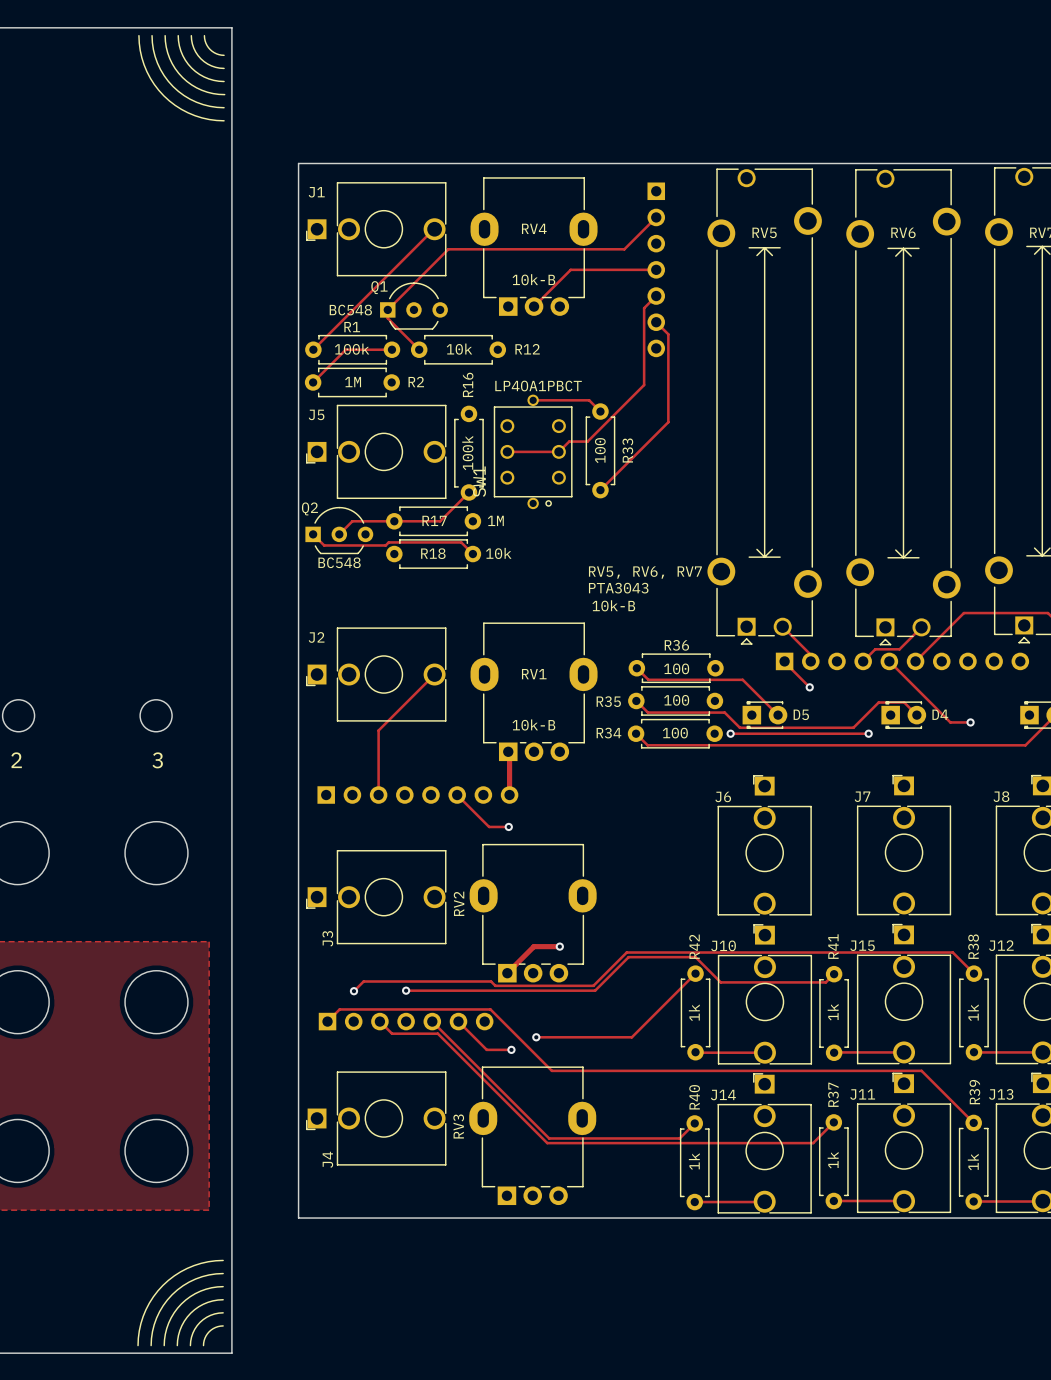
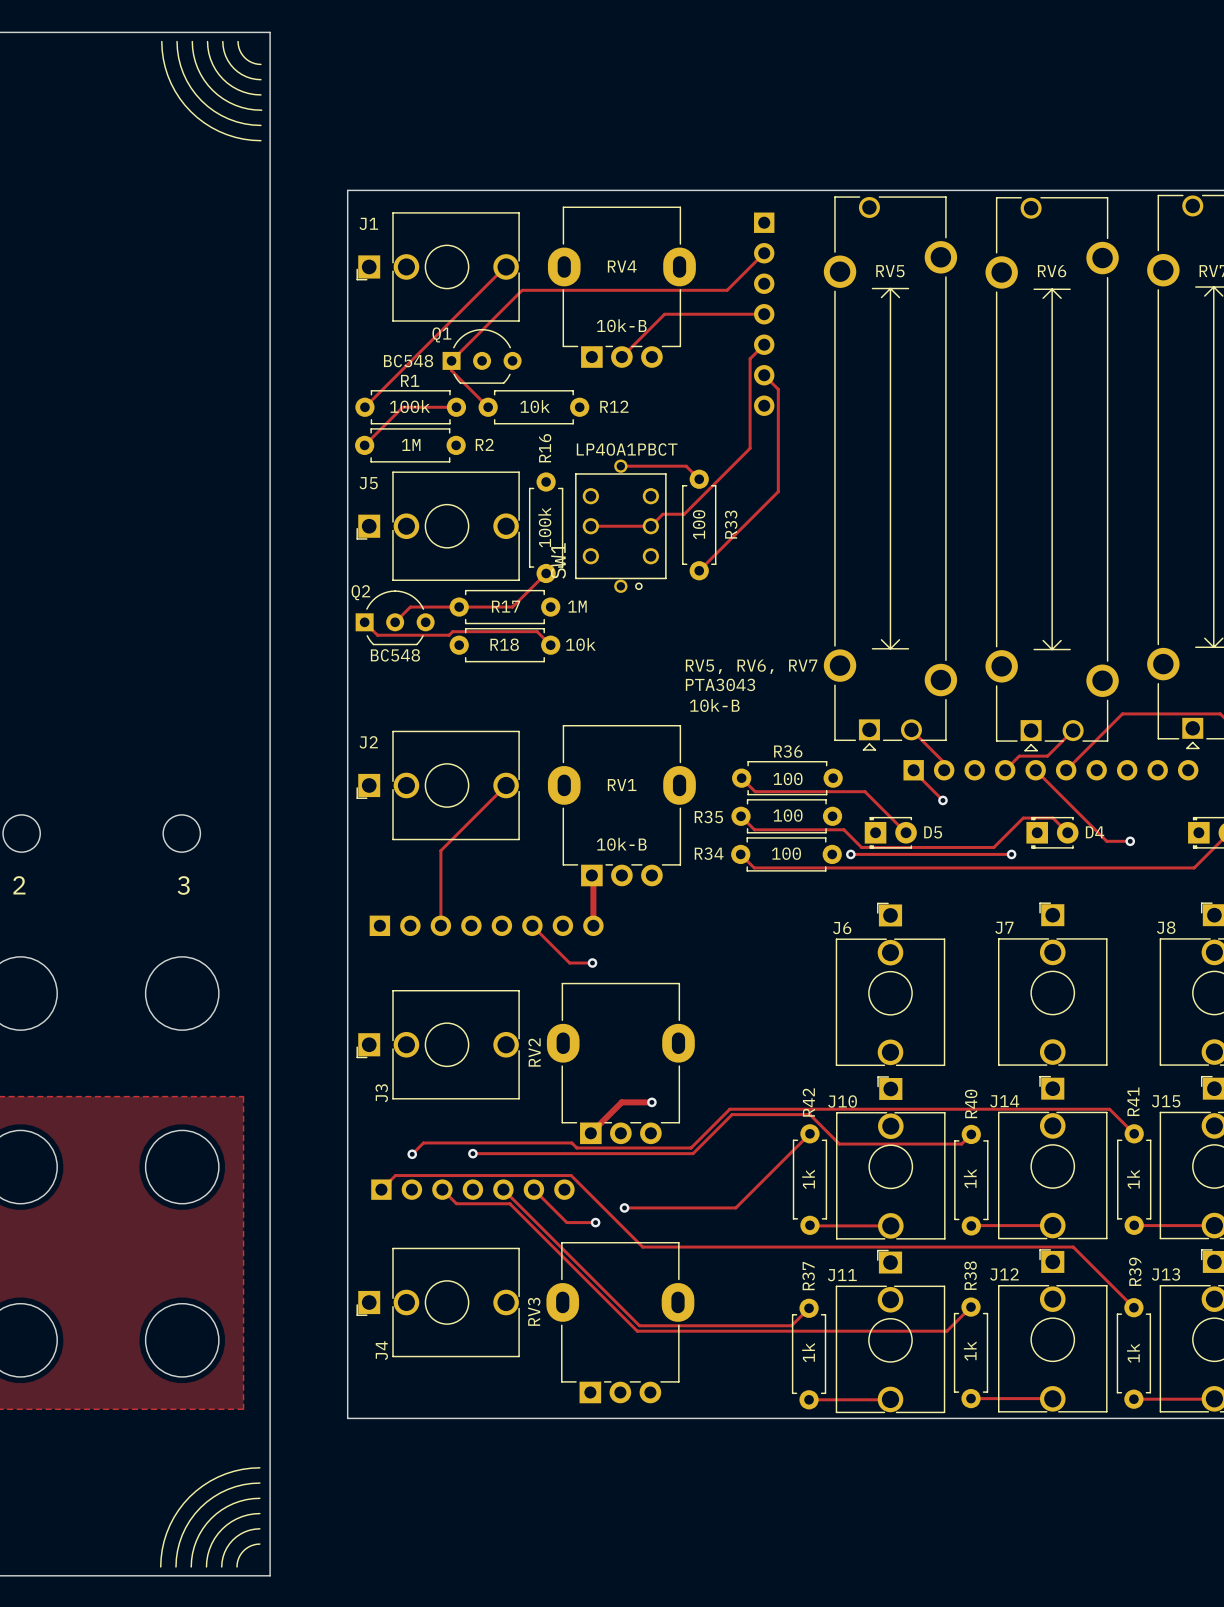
J15 name: J15 (862, 945) -> J14 (1004, 1101)
J12 name: J12 (1001, 945) -> J15 (1166, 1101)
R41 name: R41 (833, 946) -> R40 (971, 1103)
R38 name: R38 (973, 946) -> R41 (1133, 1101)
R37 name: R37 (833, 1094) -> R38 (970, 1275)
J11 name: J11 (862, 1094) -> J12 (1004, 1274)
J14 name: J14 (723, 1095) -> J11 (842, 1275)
R40 name: R40 (694, 1097) -> R37 (808, 1276)

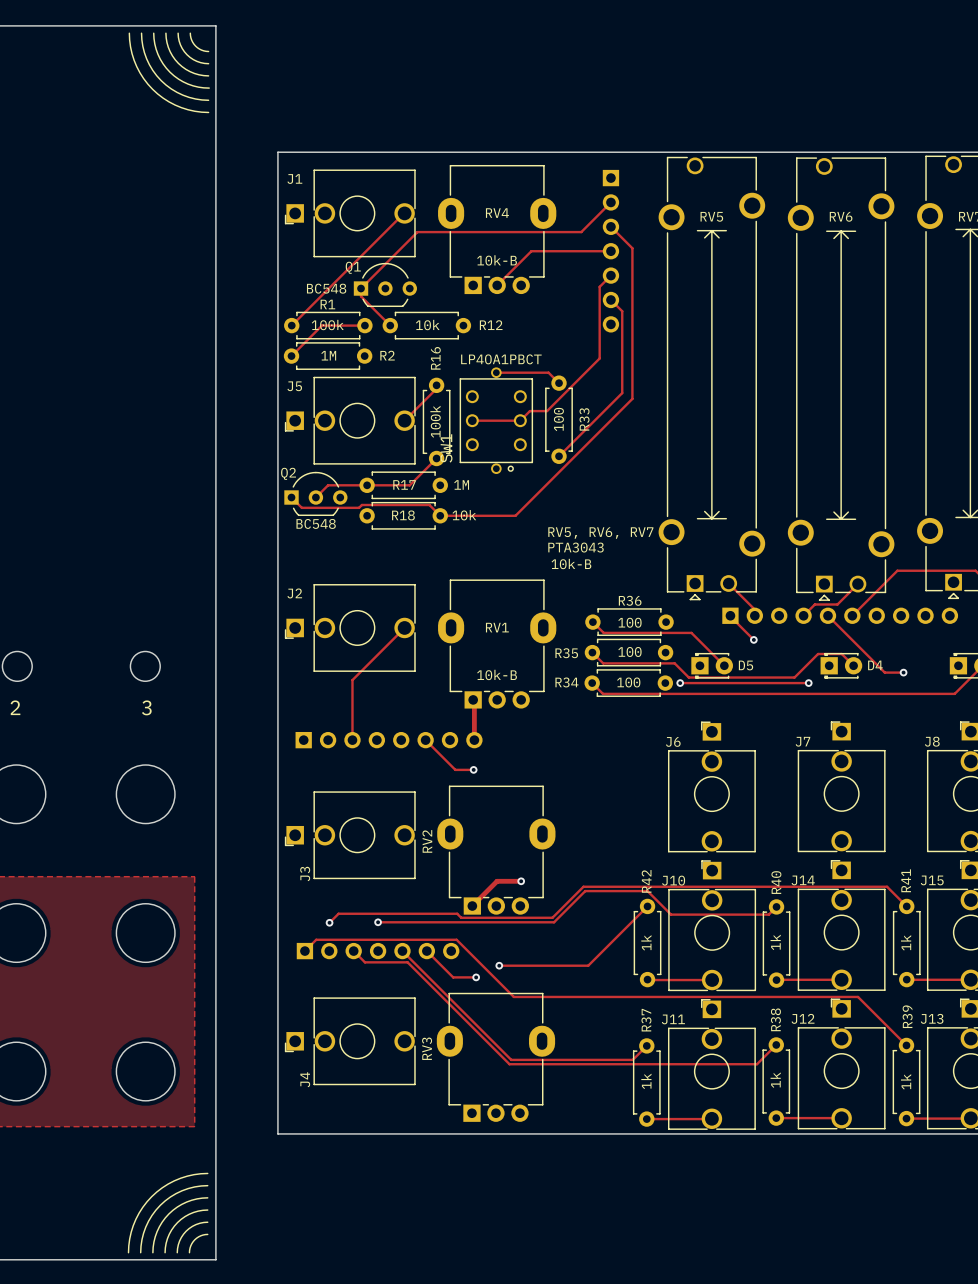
track: none -> (610, 226) (632, 248) (632, 398) (515, 515) (440, 515)
track: none -> (436, 385) (436, 388) (404, 420)

